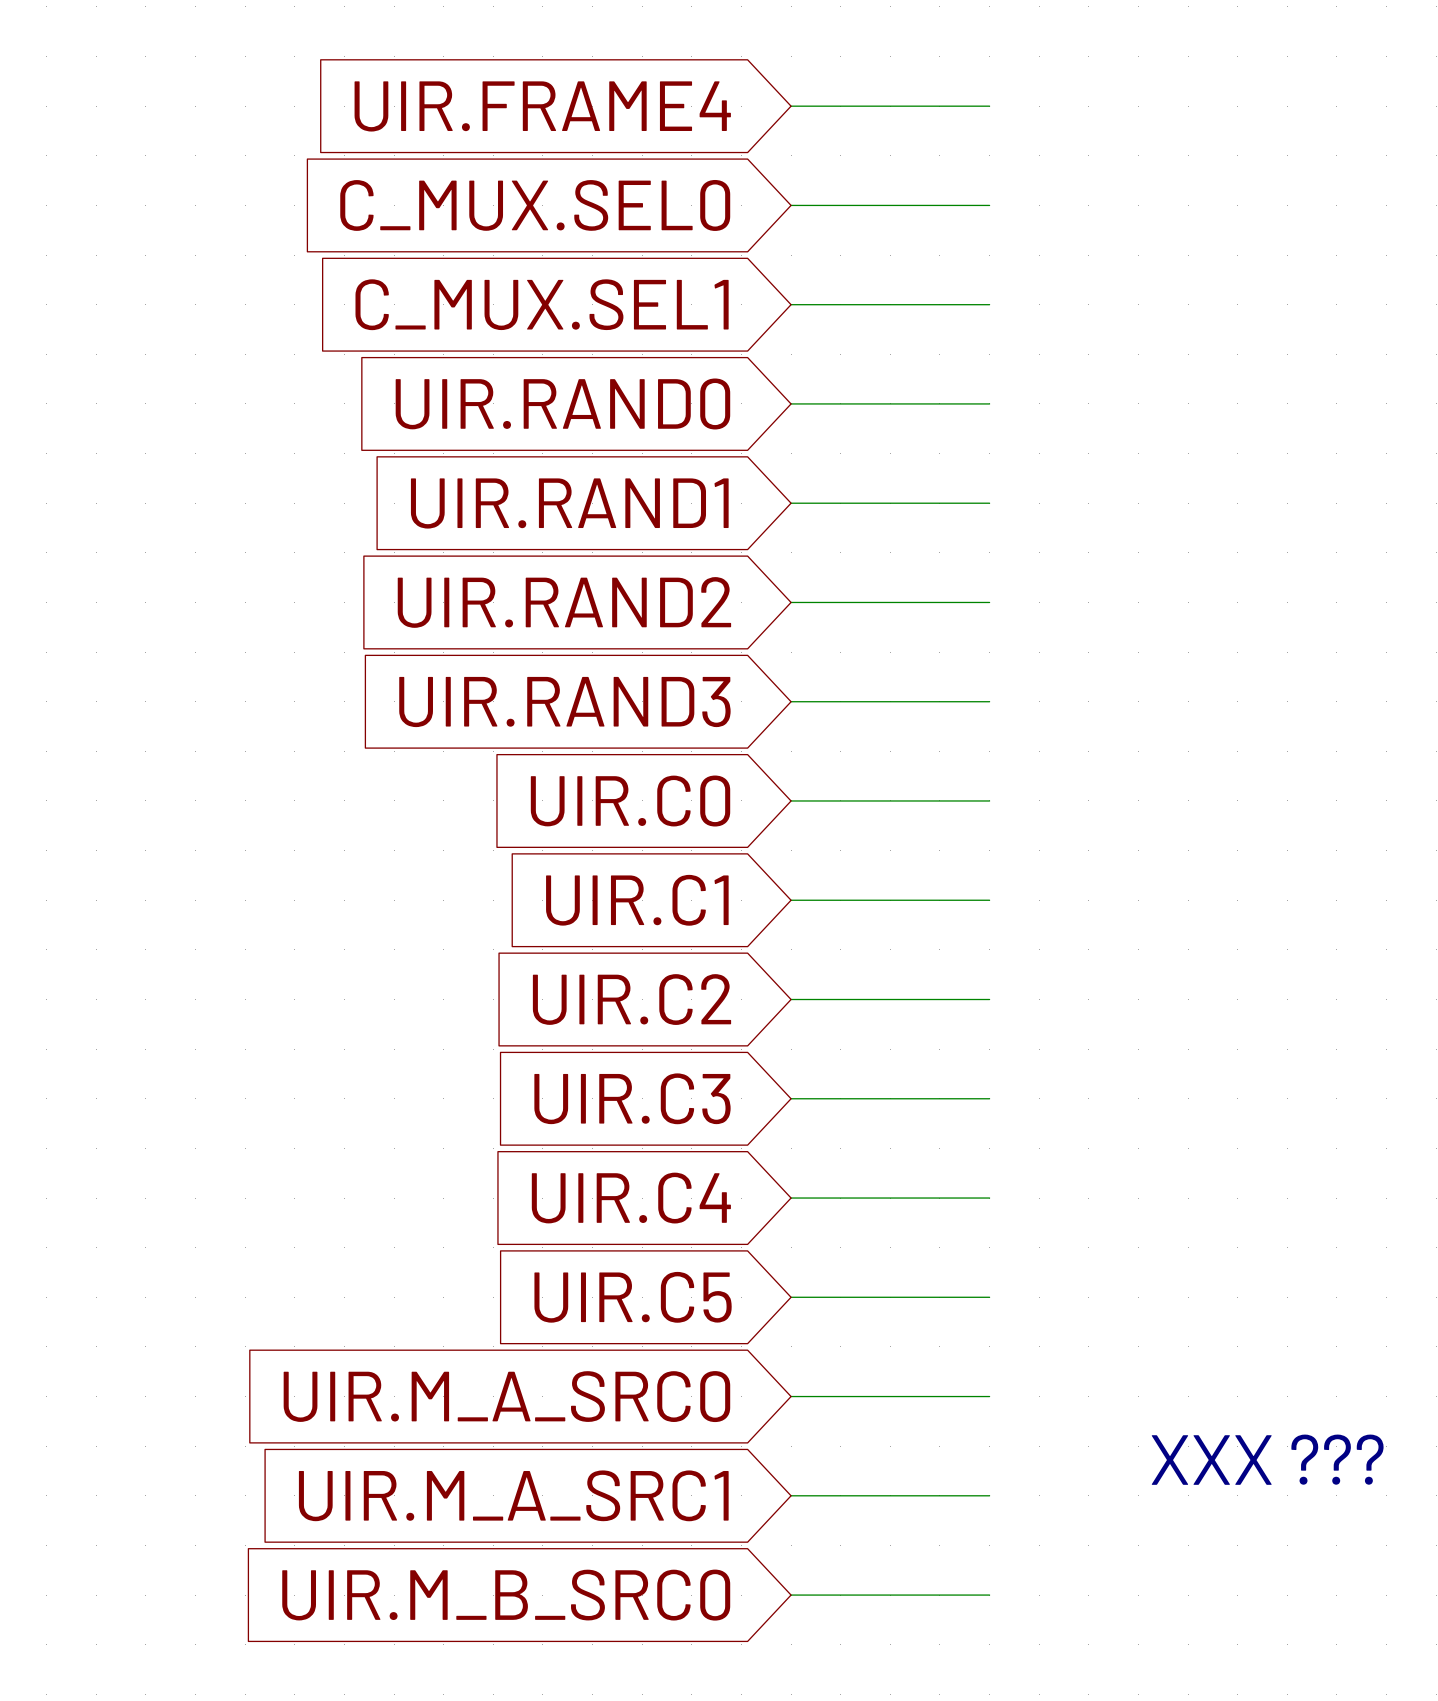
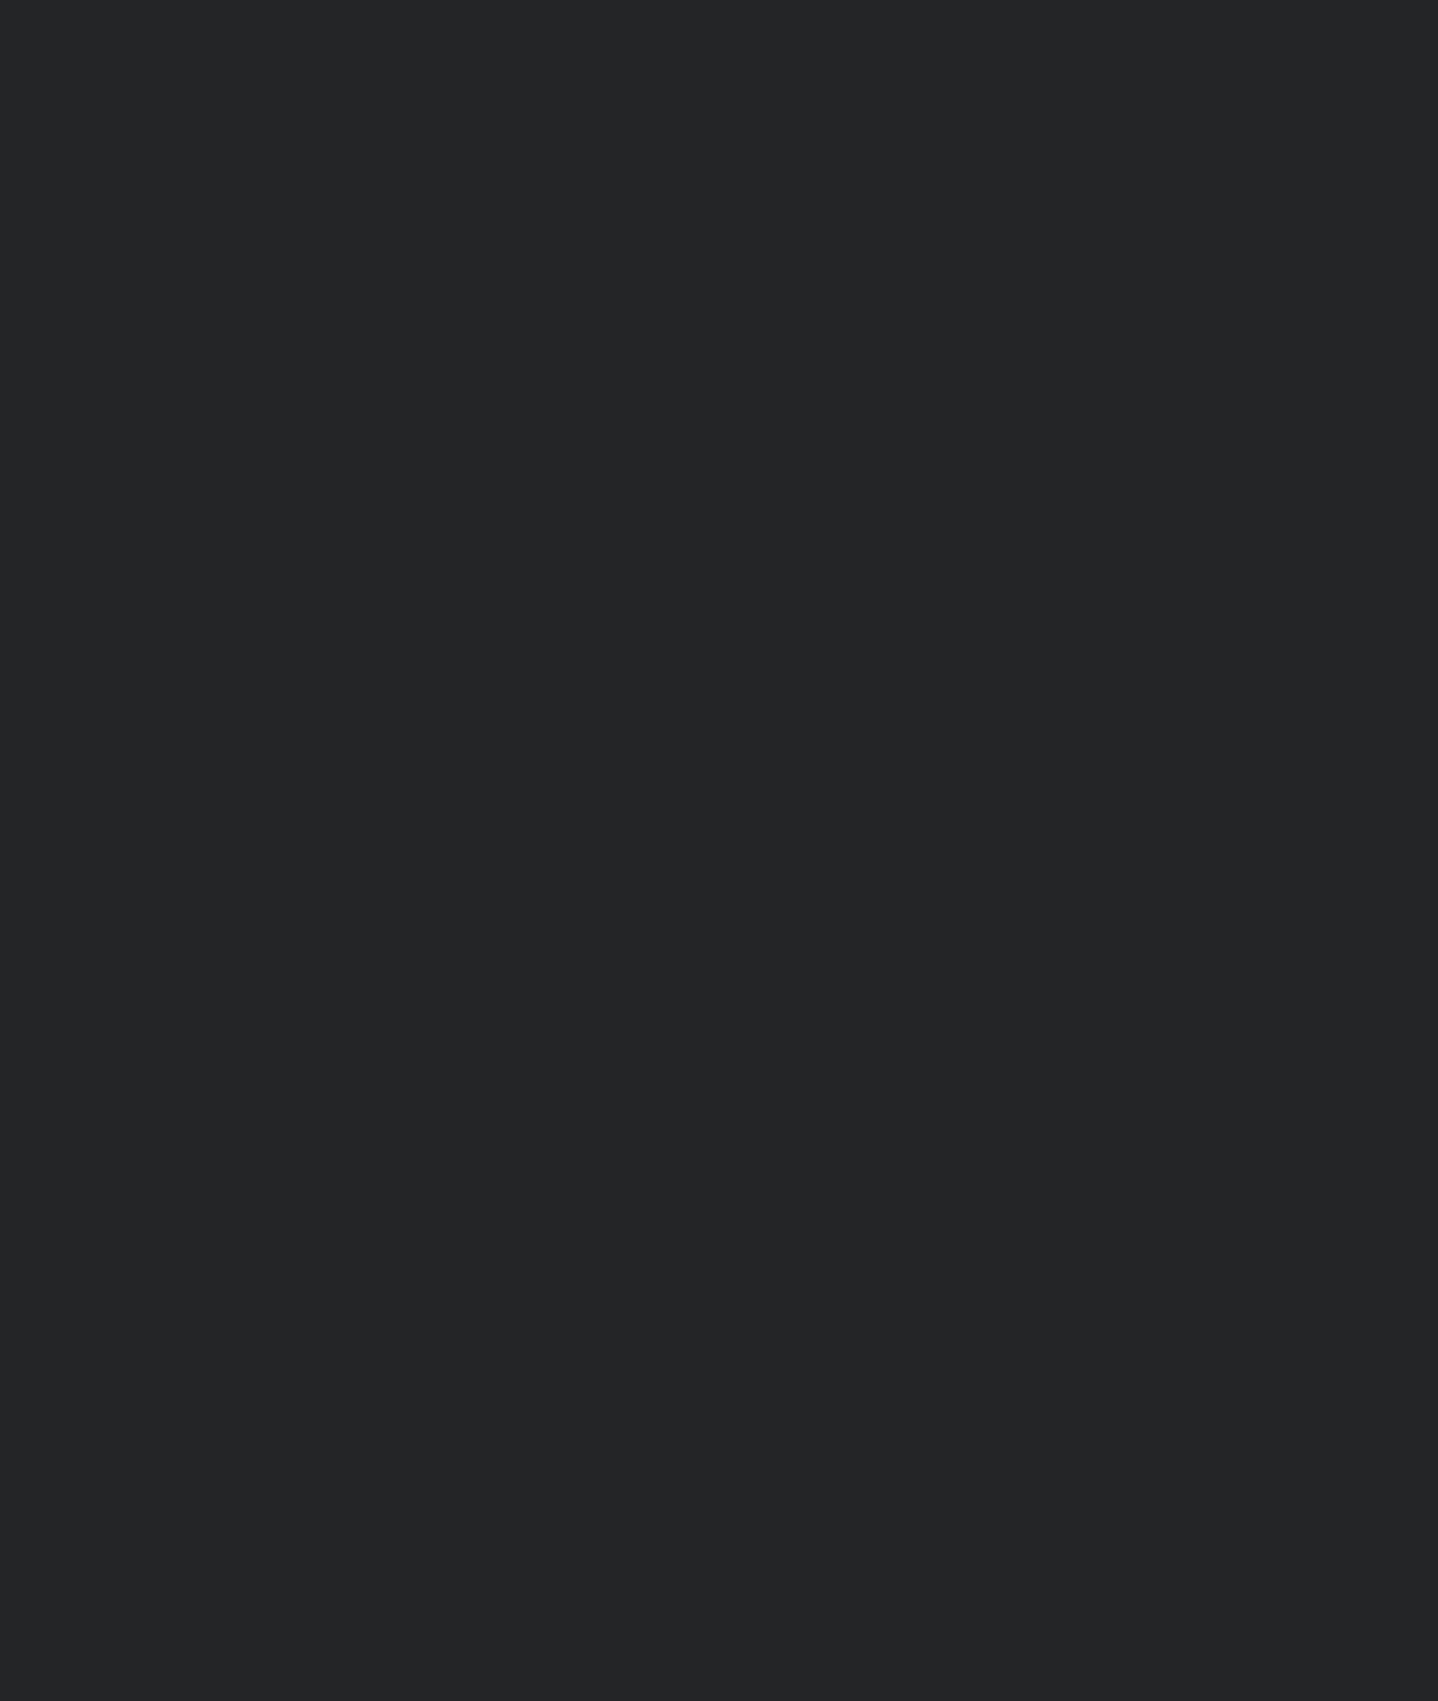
global label: UIR.FRAME4 (542, 106) -> none
wire: (791, 106) (989, 106) -> none
global label: C_MUX.SEL0 (535, 205) -> none
wire: (791, 205) (989, 205) -> none
global label: C_MUX.SEL1 (542, 304) -> none
wire: (791, 304) (989, 304) -> none
global label: UIR.RAND0 (562, 403) -> none
wire: (791, 403) (989, 403) -> none
global label: UIR.RAND1 (569, 503) -> none
wire: (791, 503) (989, 503) -> none
global label: UIR.RAND2 (564, 602) -> none
wire: (791, 602) (989, 602) -> none
wire: (791, 701) (989, 701) -> none
global label: UIR.RAND3 (564, 702) -> none
wire: (791, 800) (989, 800) -> none
global label: UIR.C0 (630, 801) -> none
global label: UIR.C1 (637, 900) -> none
wire: (791, 900) (989, 900) -> none
global label: UIR.C2 (631, 999) -> none
wire: (791, 999) (989, 999) -> none
global label: UIR.C3 (632, 1098) -> none
wire: (791, 1098) (989, 1098) -> none
global label: UIR.C4 (631, 1198) -> none
wire: (791, 1198) (989, 1198) -> none
global label: UIR.C5 (633, 1297) -> none
wire: (791, 1297) (989, 1297) -> none
global label: UIR.M_A_SRC0 (506, 1396) -> none
wire: (791, 1396) (989, 1396) -> none
text: XXX ??? (1267, 1459) -> none
global label: UIR.M_A_SRC1 (513, 1495) -> none
wire: (791, 1495) (989, 1495) -> none
global label: UIR.M_B_SRC0 (506, 1595) -> none
wire: (791, 1595) (989, 1595) -> none

